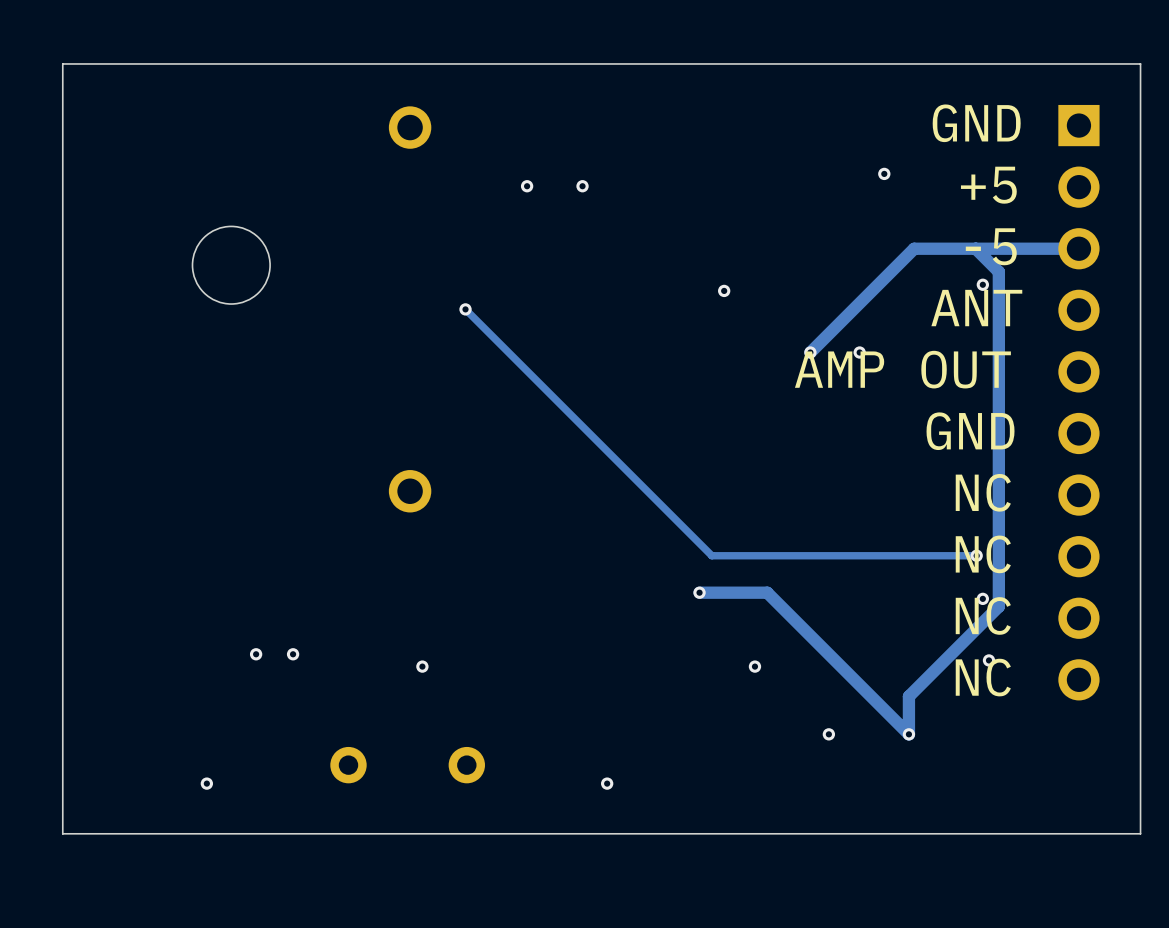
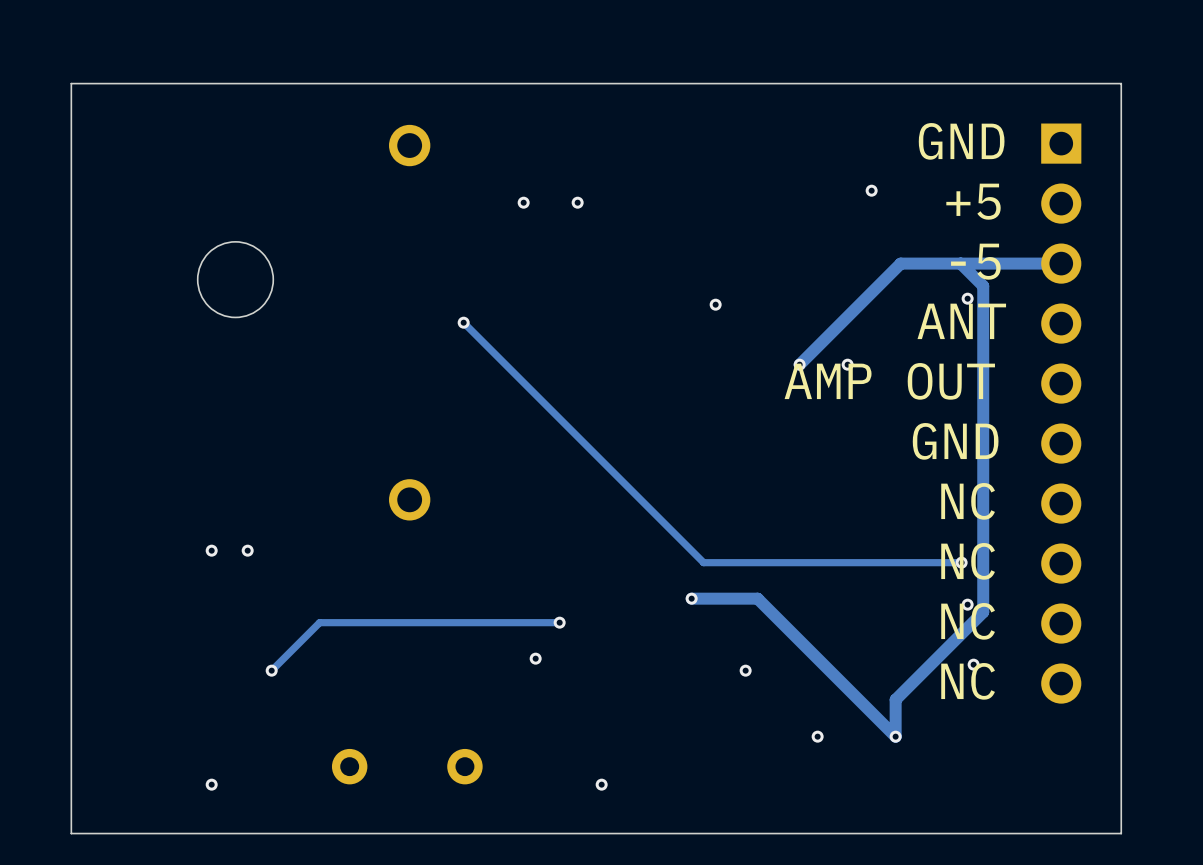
via: none -> (211, 550)
via: none -> (247, 550)
track: none -> (559, 622) (319, 622) (271, 670)
via: none -> (559, 622)
via: (256, 654) -> none
via: (293, 654) -> none
via: none -> (535, 658)
via: none -> (271, 670)
via: (422, 666) -> none

